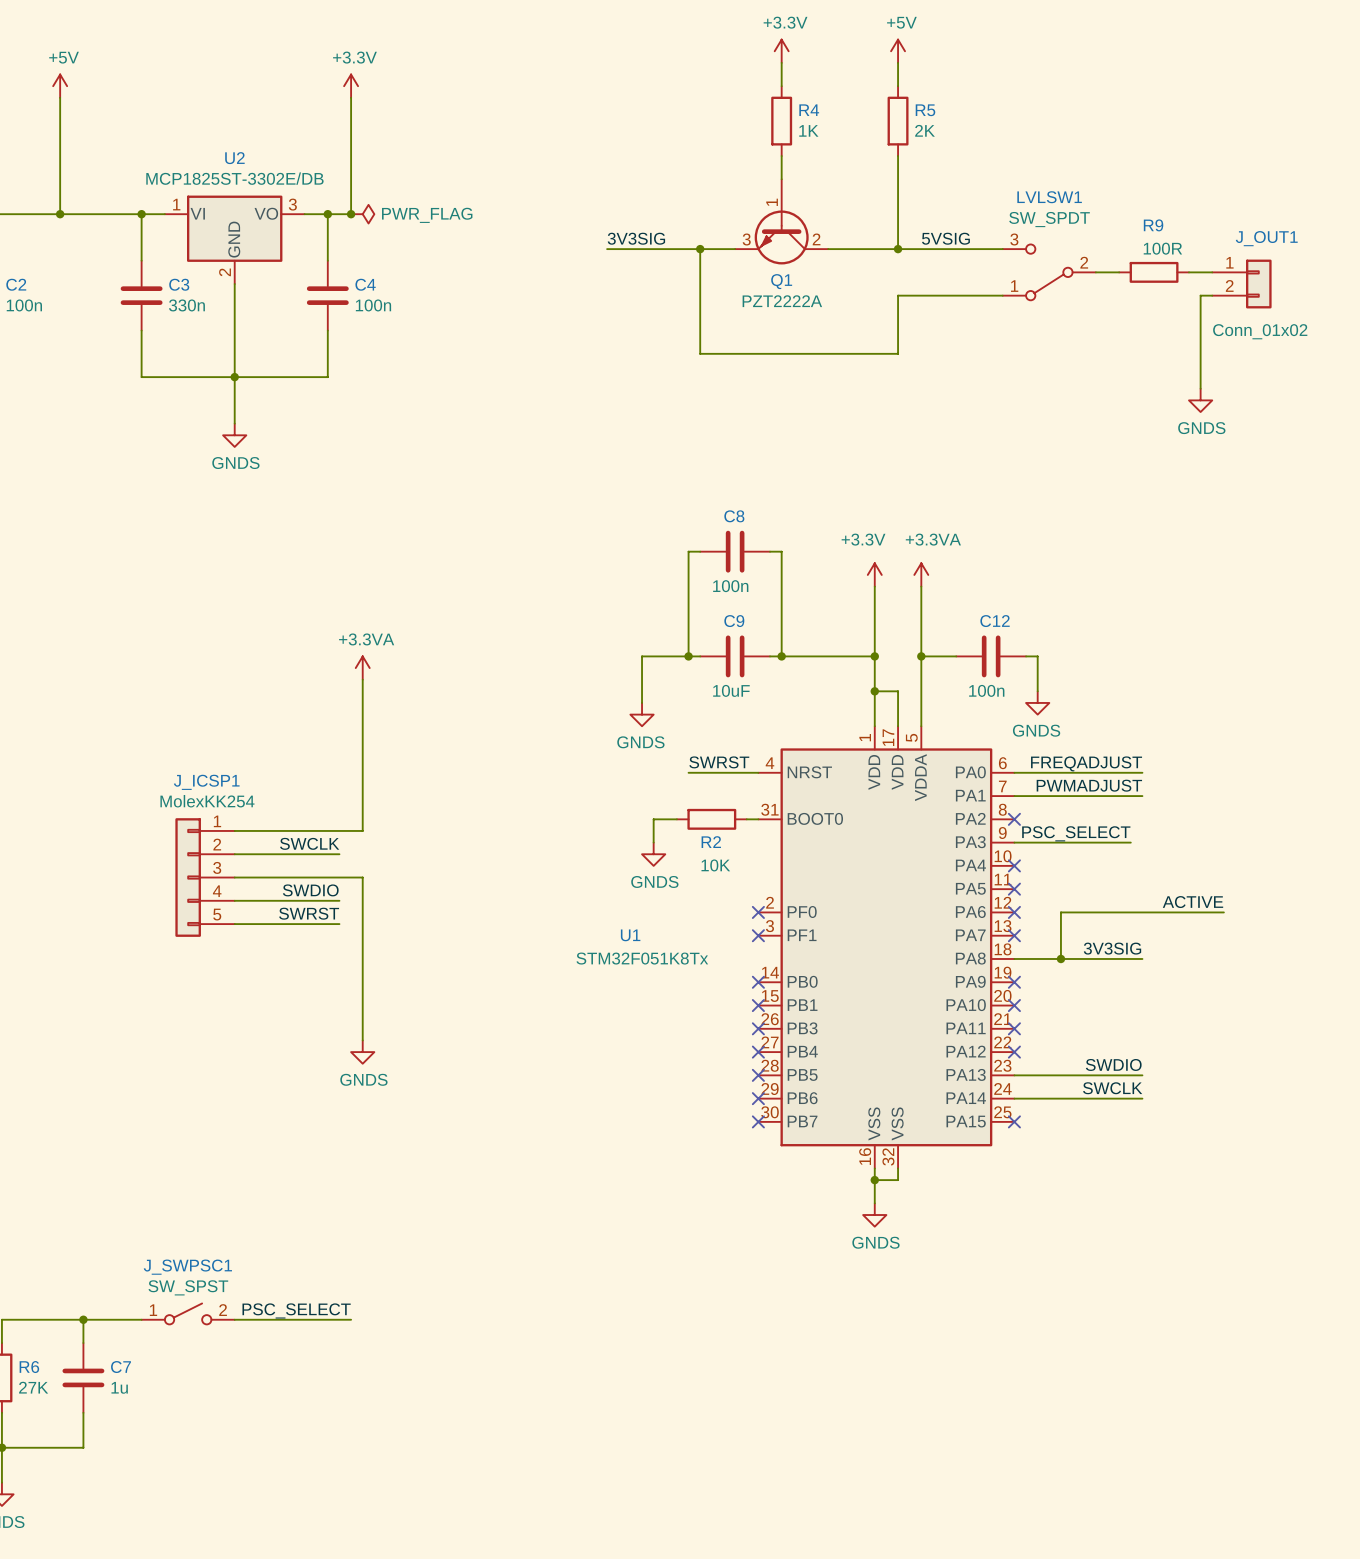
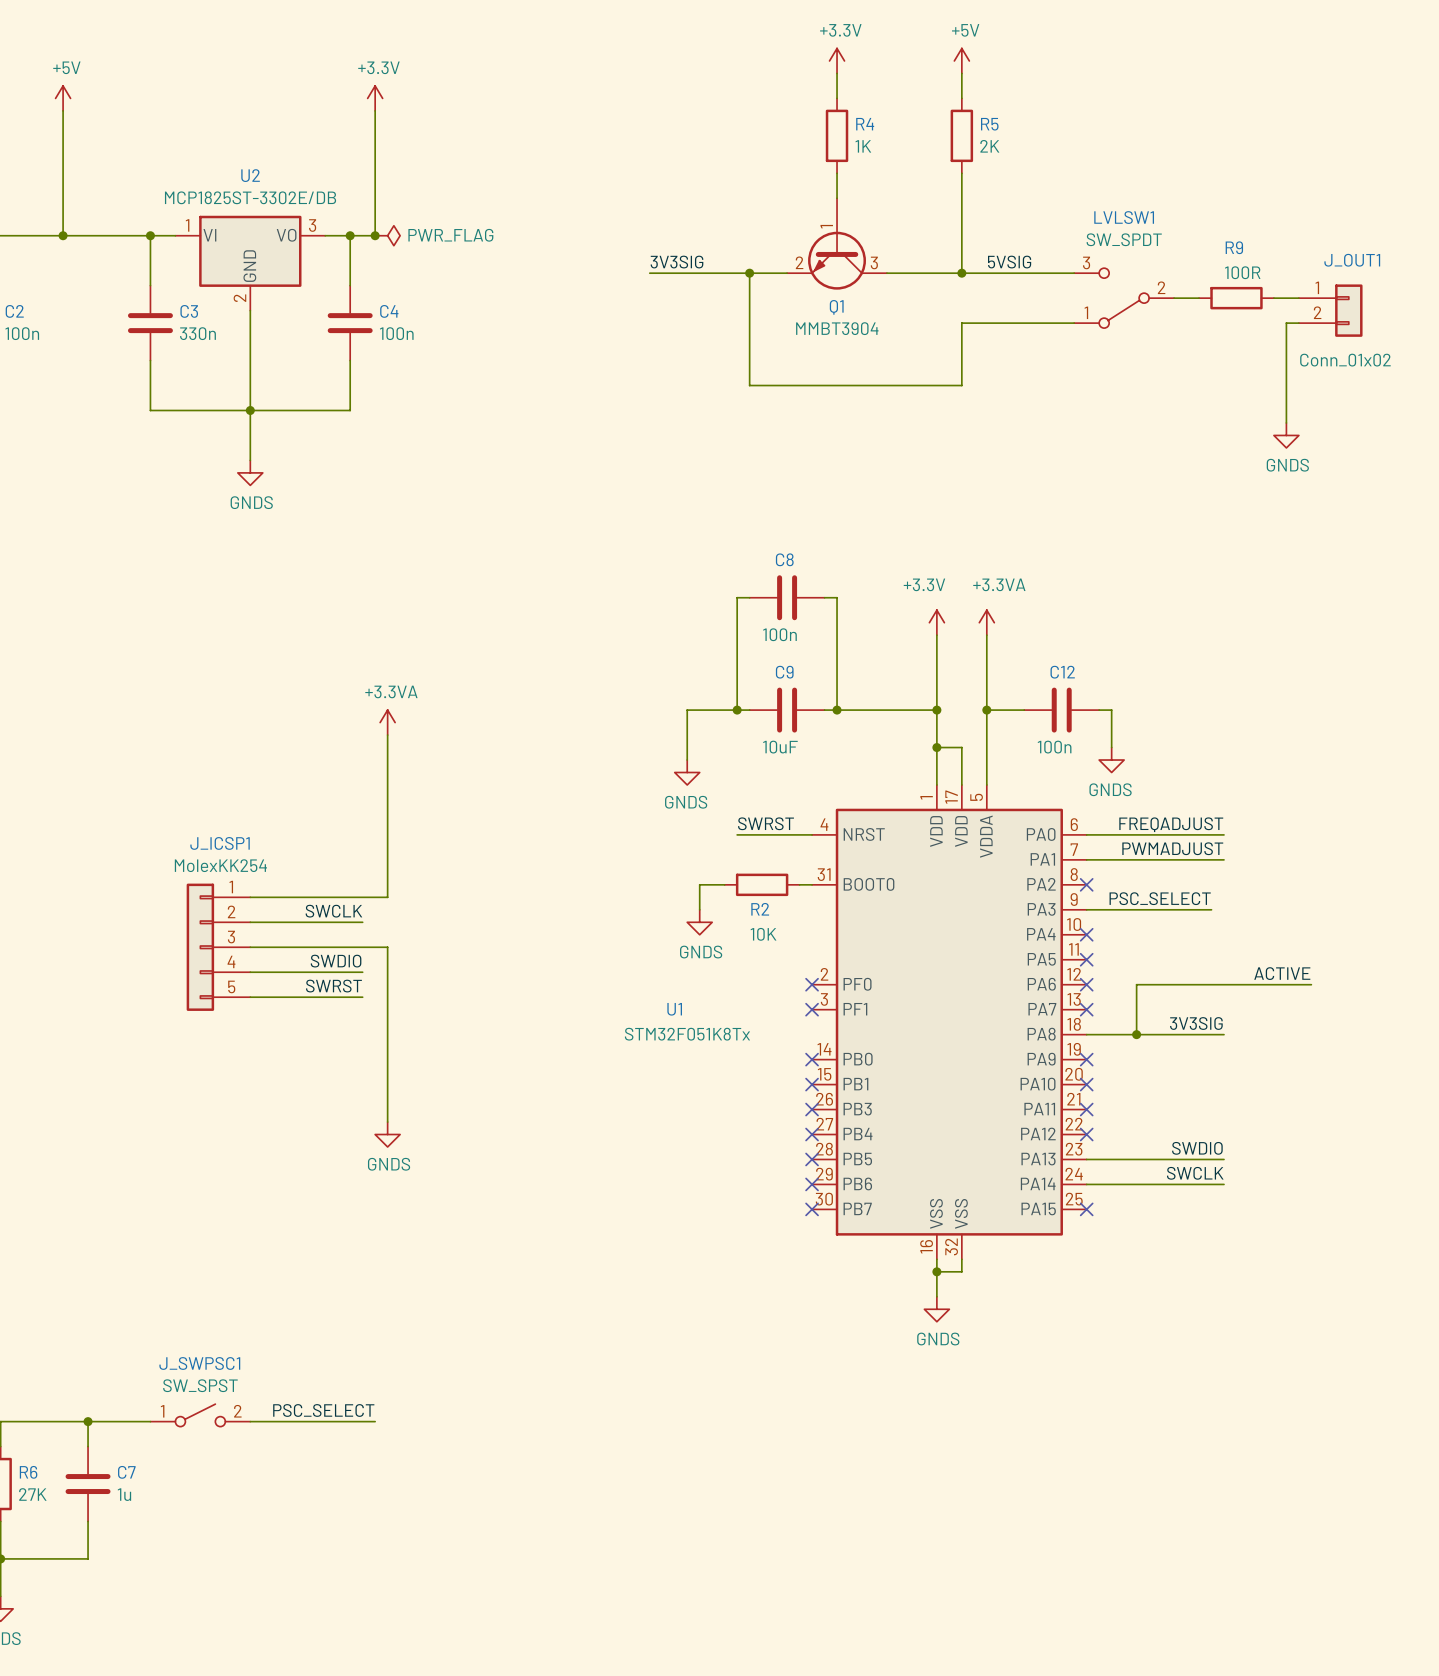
Q1 symbol: [735, 179, 829, 265] -> [787, 198, 887, 290]
Q1 value: PZT2222A (782, 301) -> MMBT3904 (837, 328)

